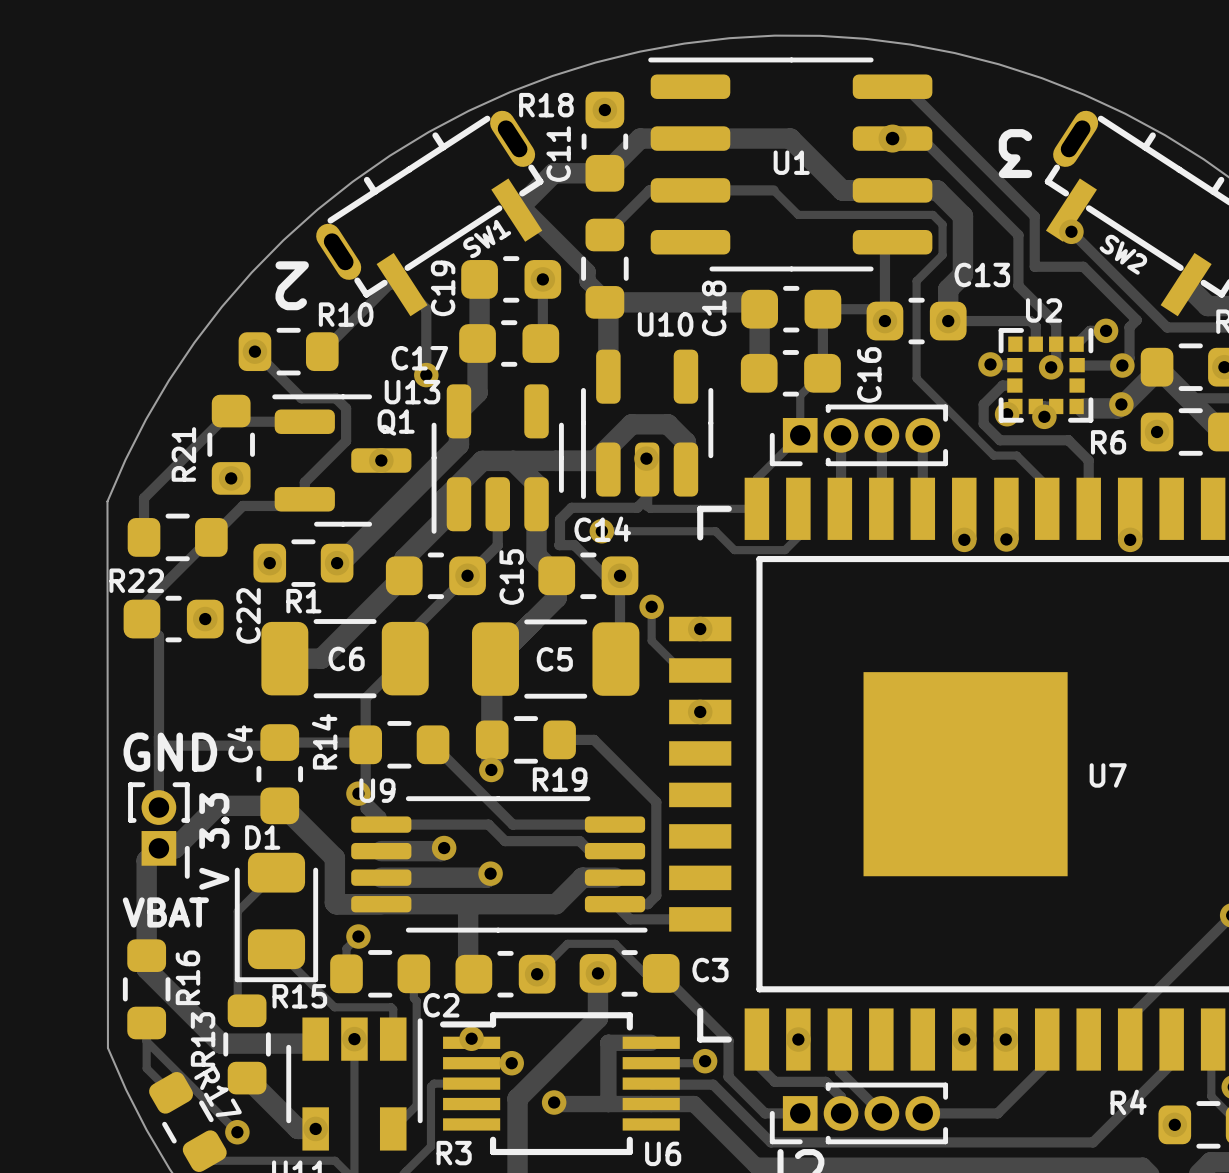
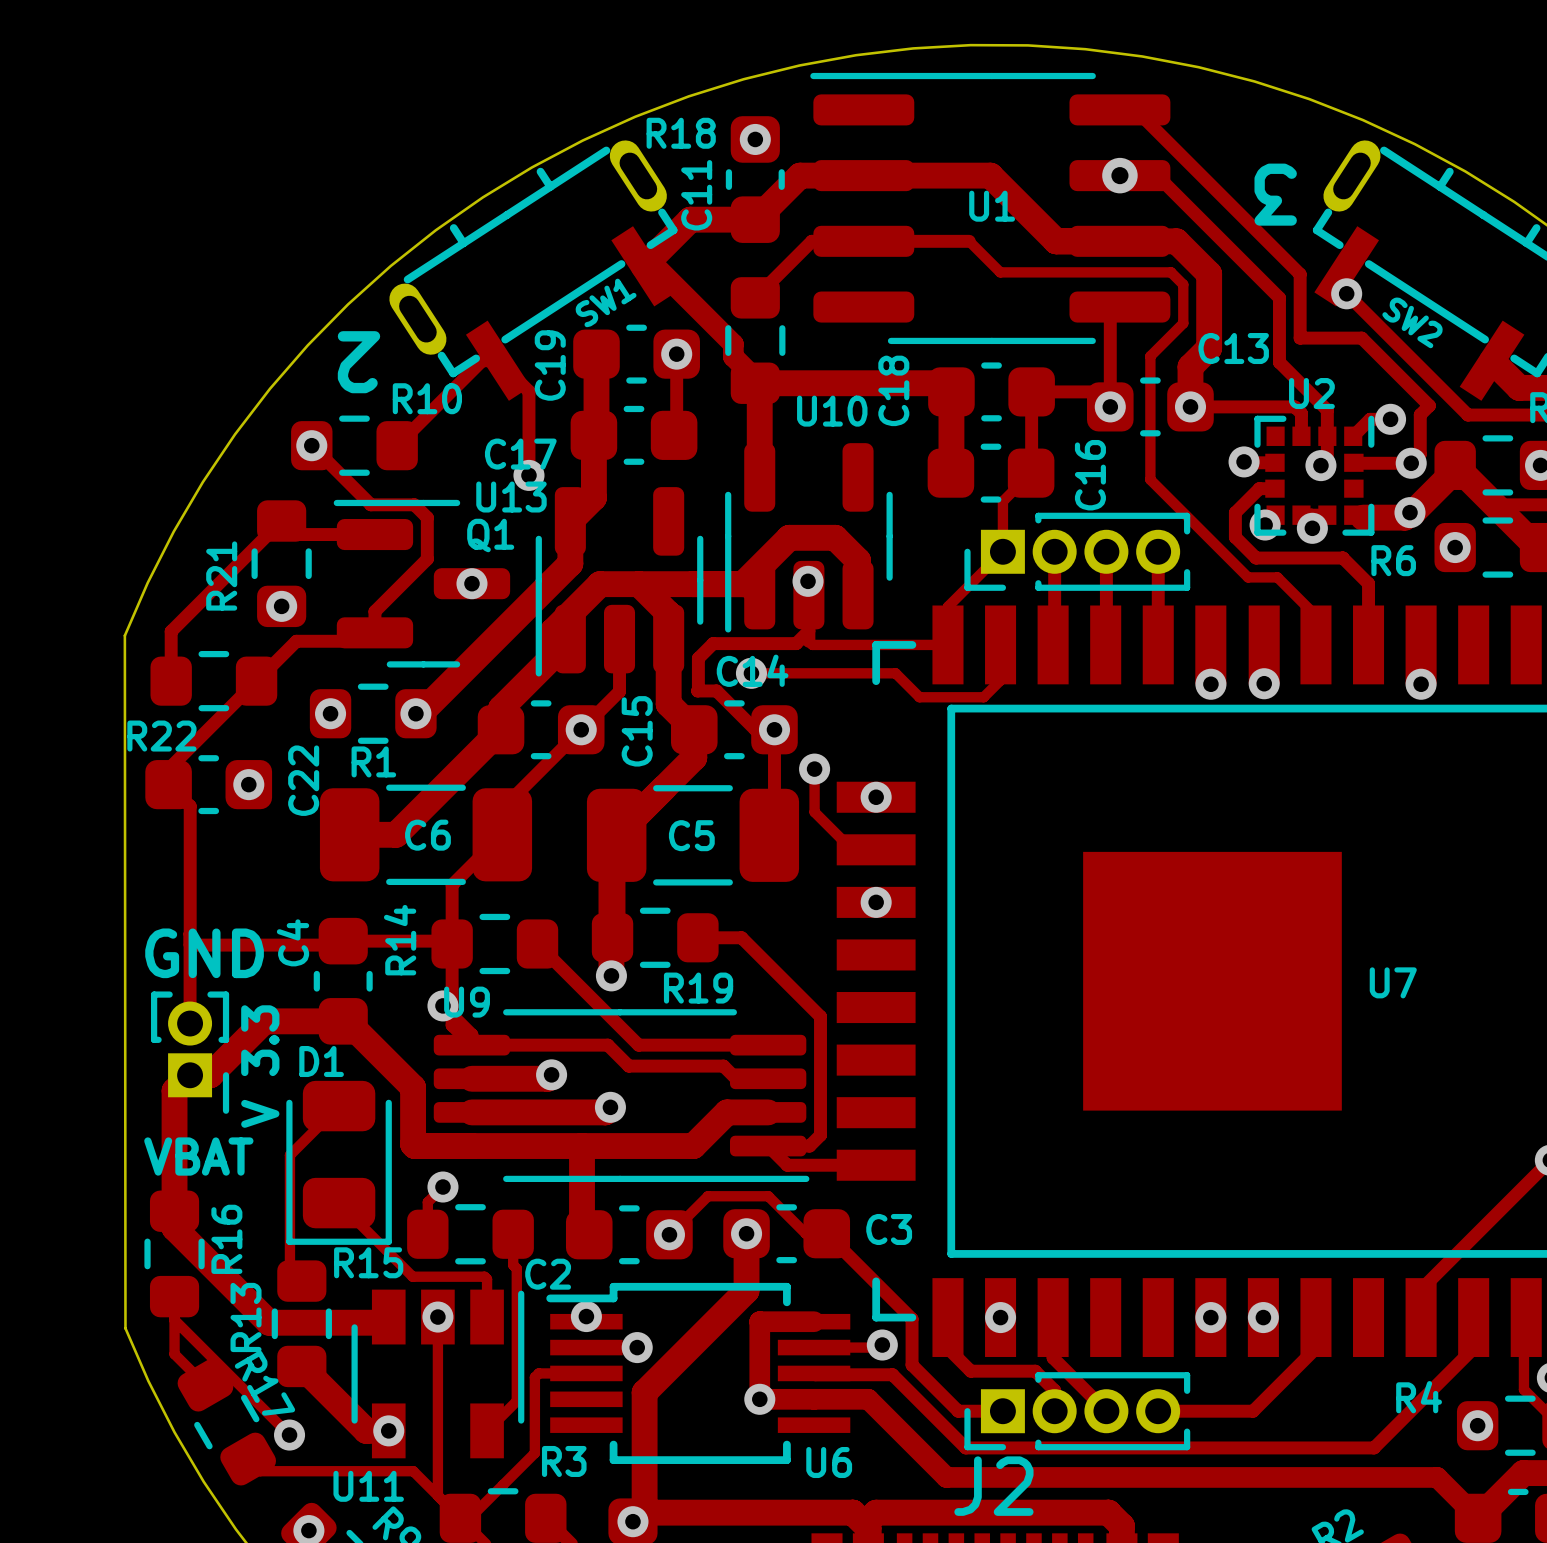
track: (554, 1102) (608, 1104) -> none
via position: (554, 1102) -> (759, 1399)

